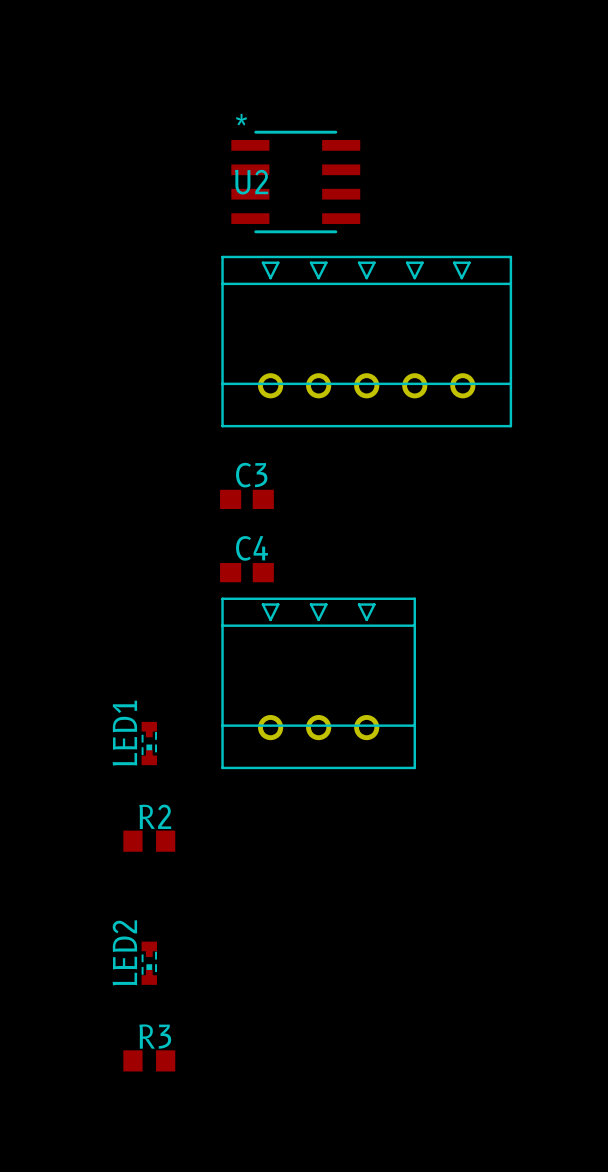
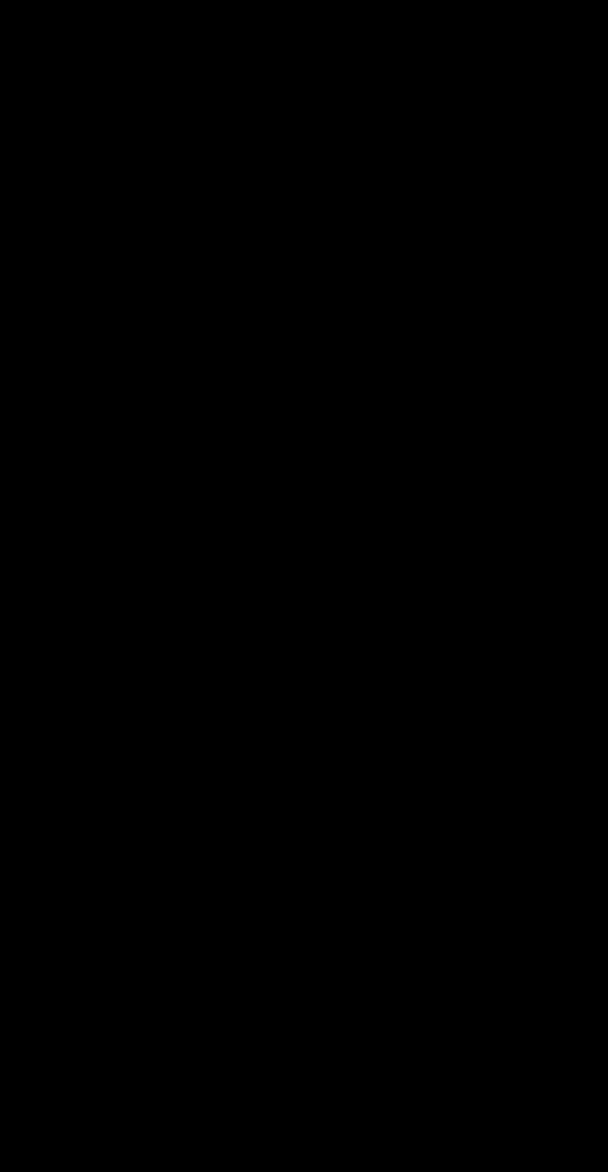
U2: (295, 182) -> none
part: (366, 341) -> none
C3: (246, 499) -> none
C4: (246, 572) -> none
part: (318, 683) -> none
LED1: (149, 743) -> none
R2: (149, 841) -> none
LED2: (149, 963) -> none
R3: (149, 1060) -> none

